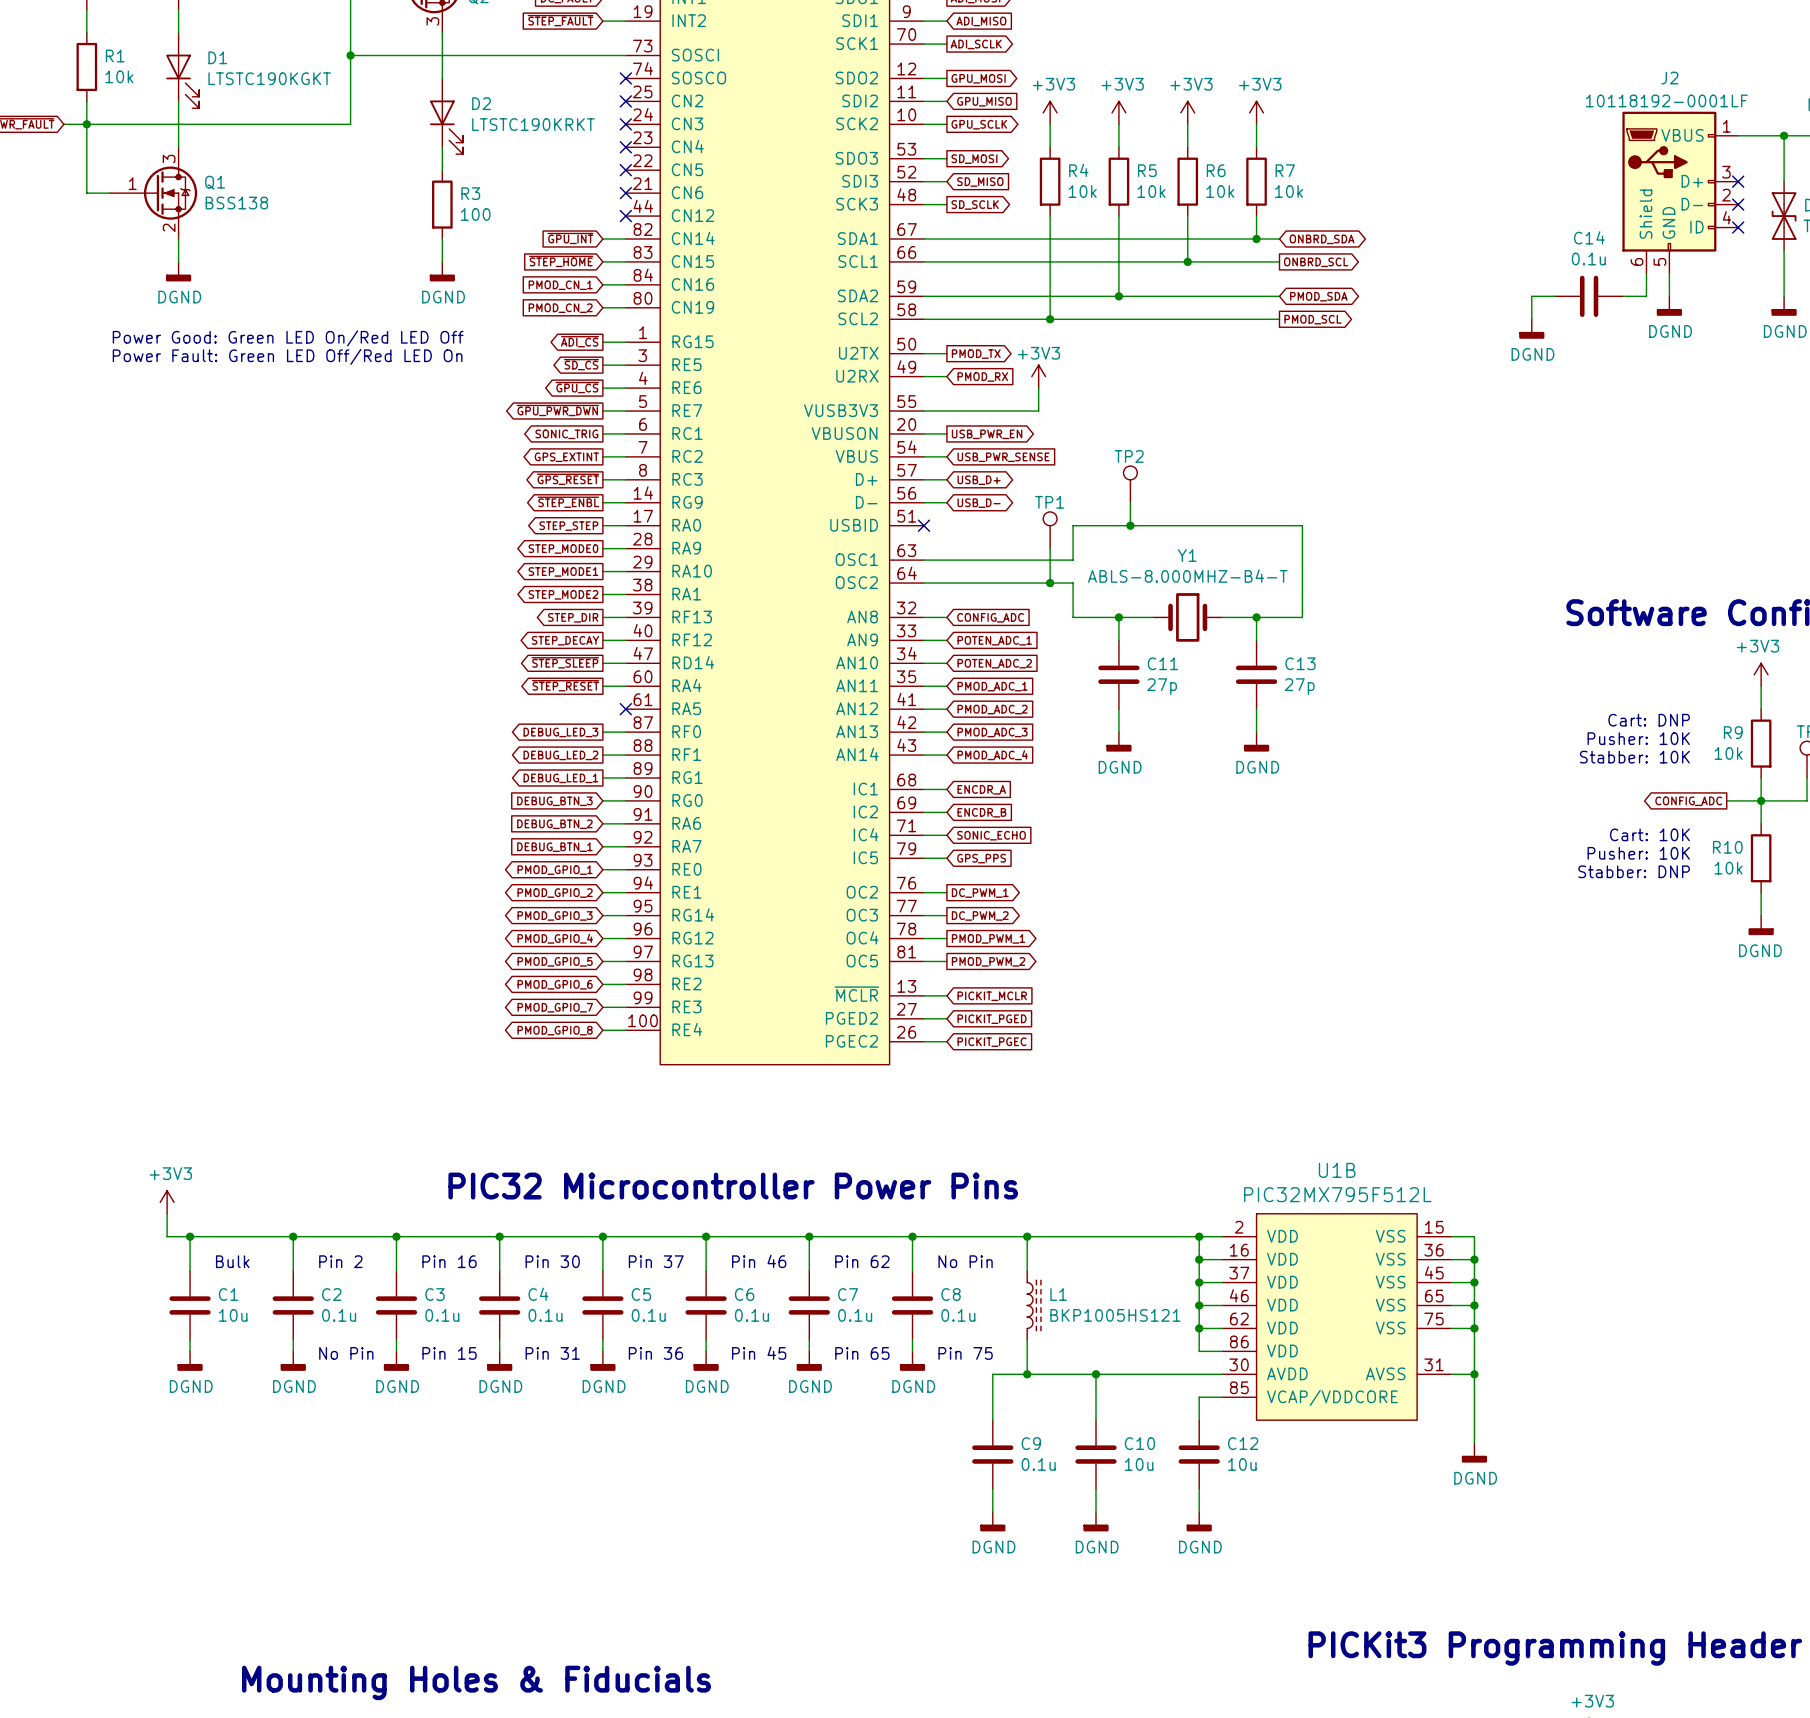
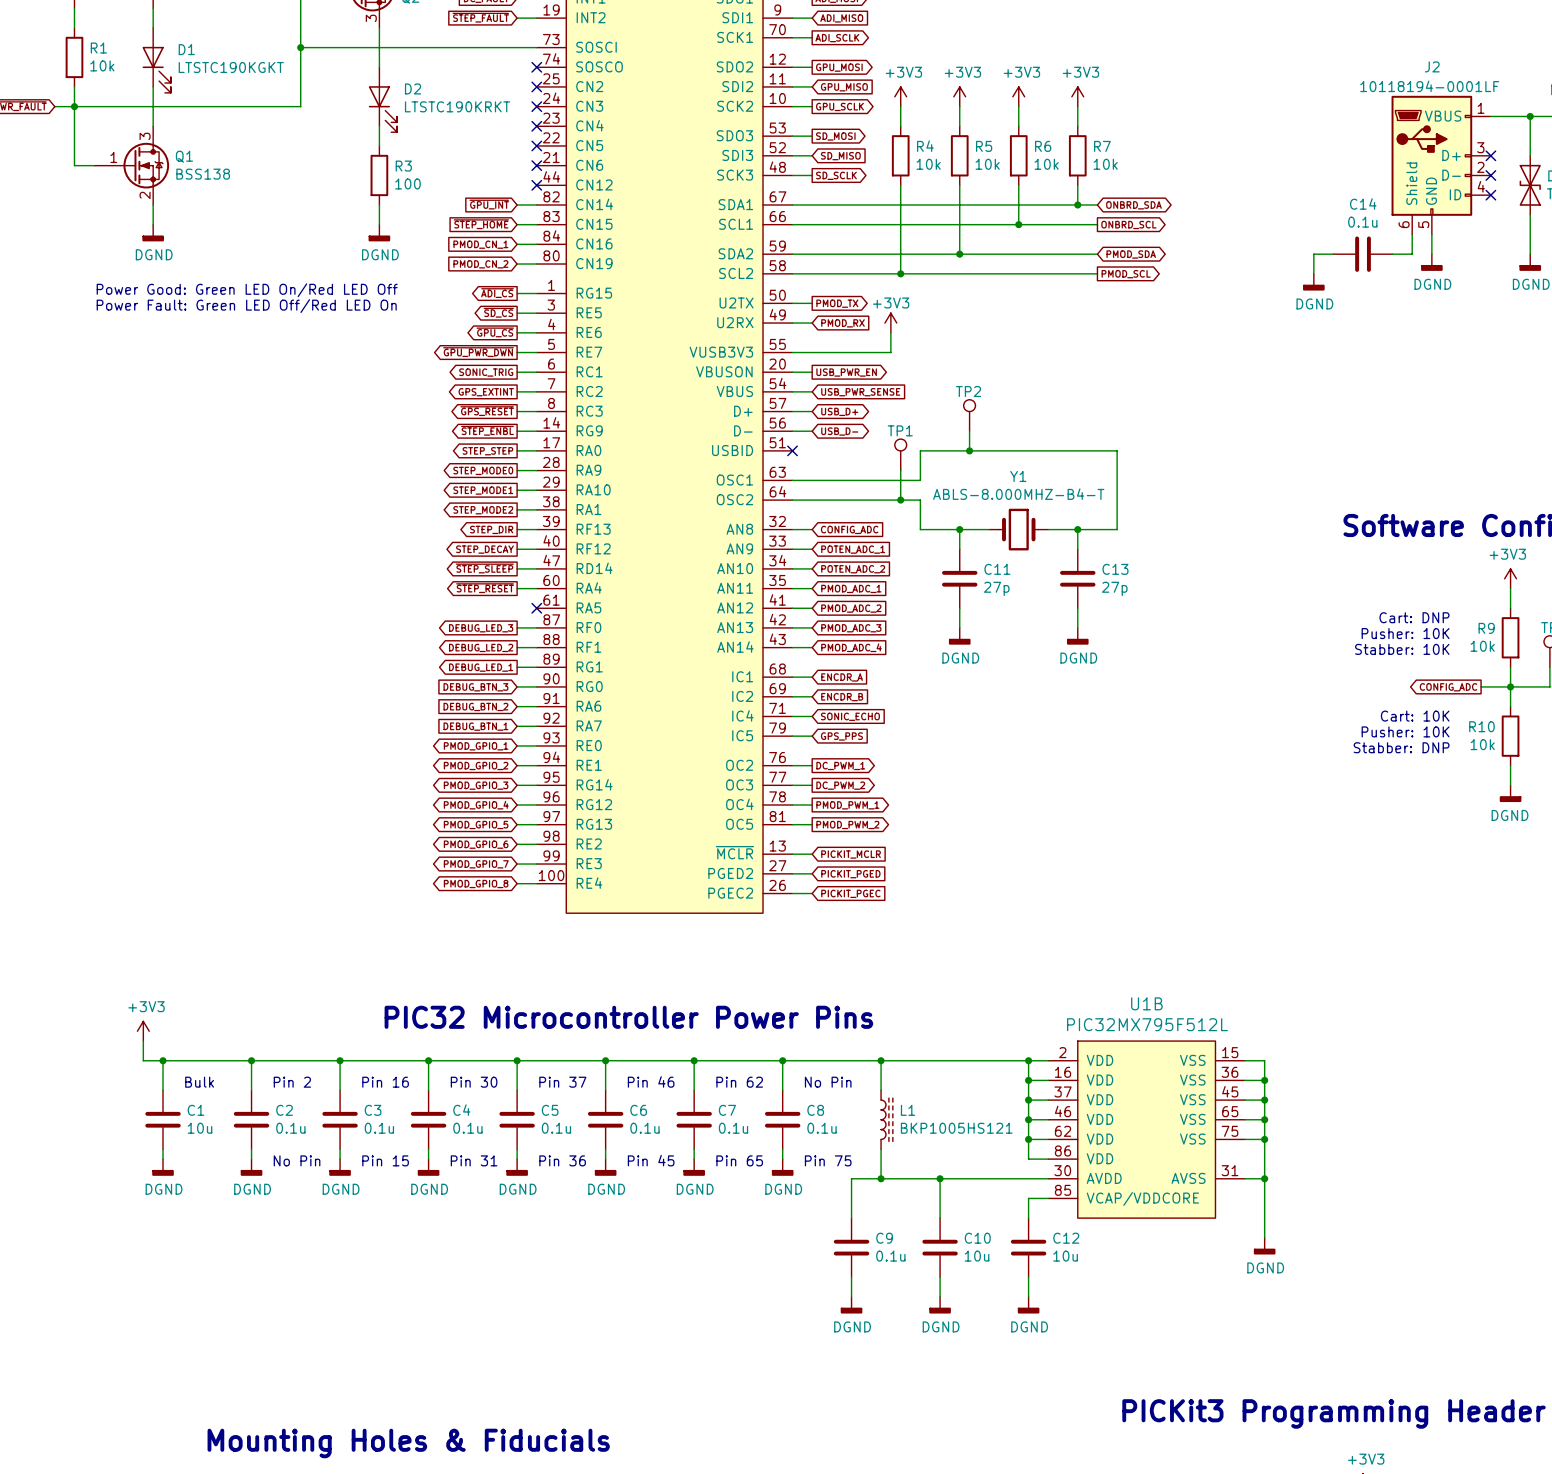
J2 value: 10118192-0001LF (1666, 100) -> 10118194-0001LF (1429, 86)

